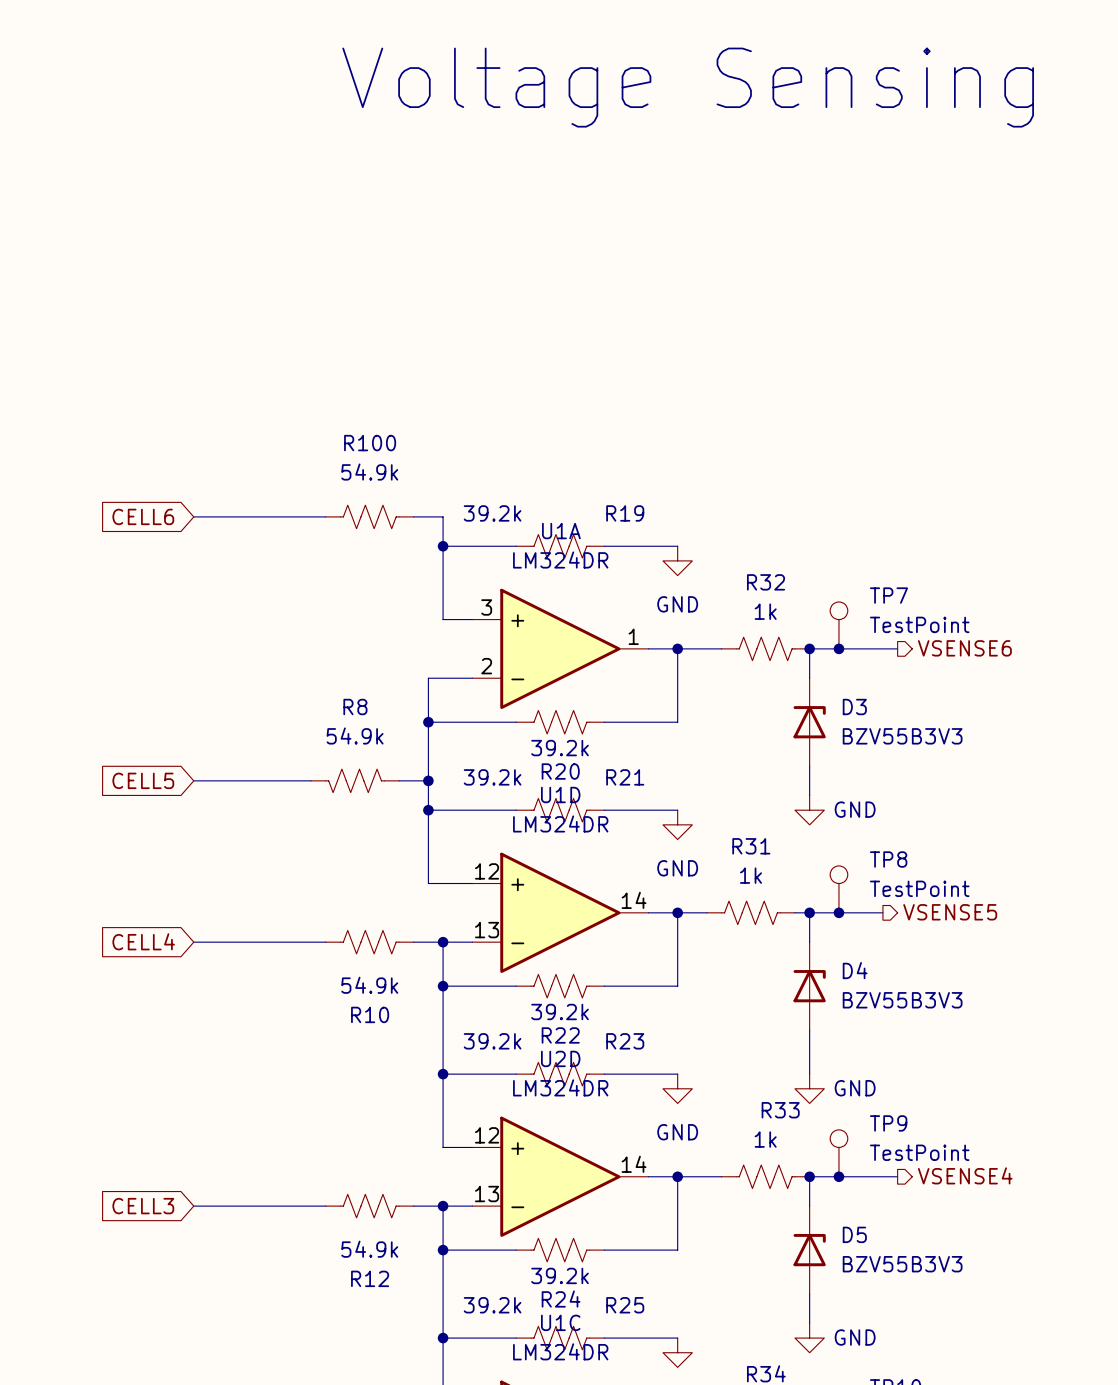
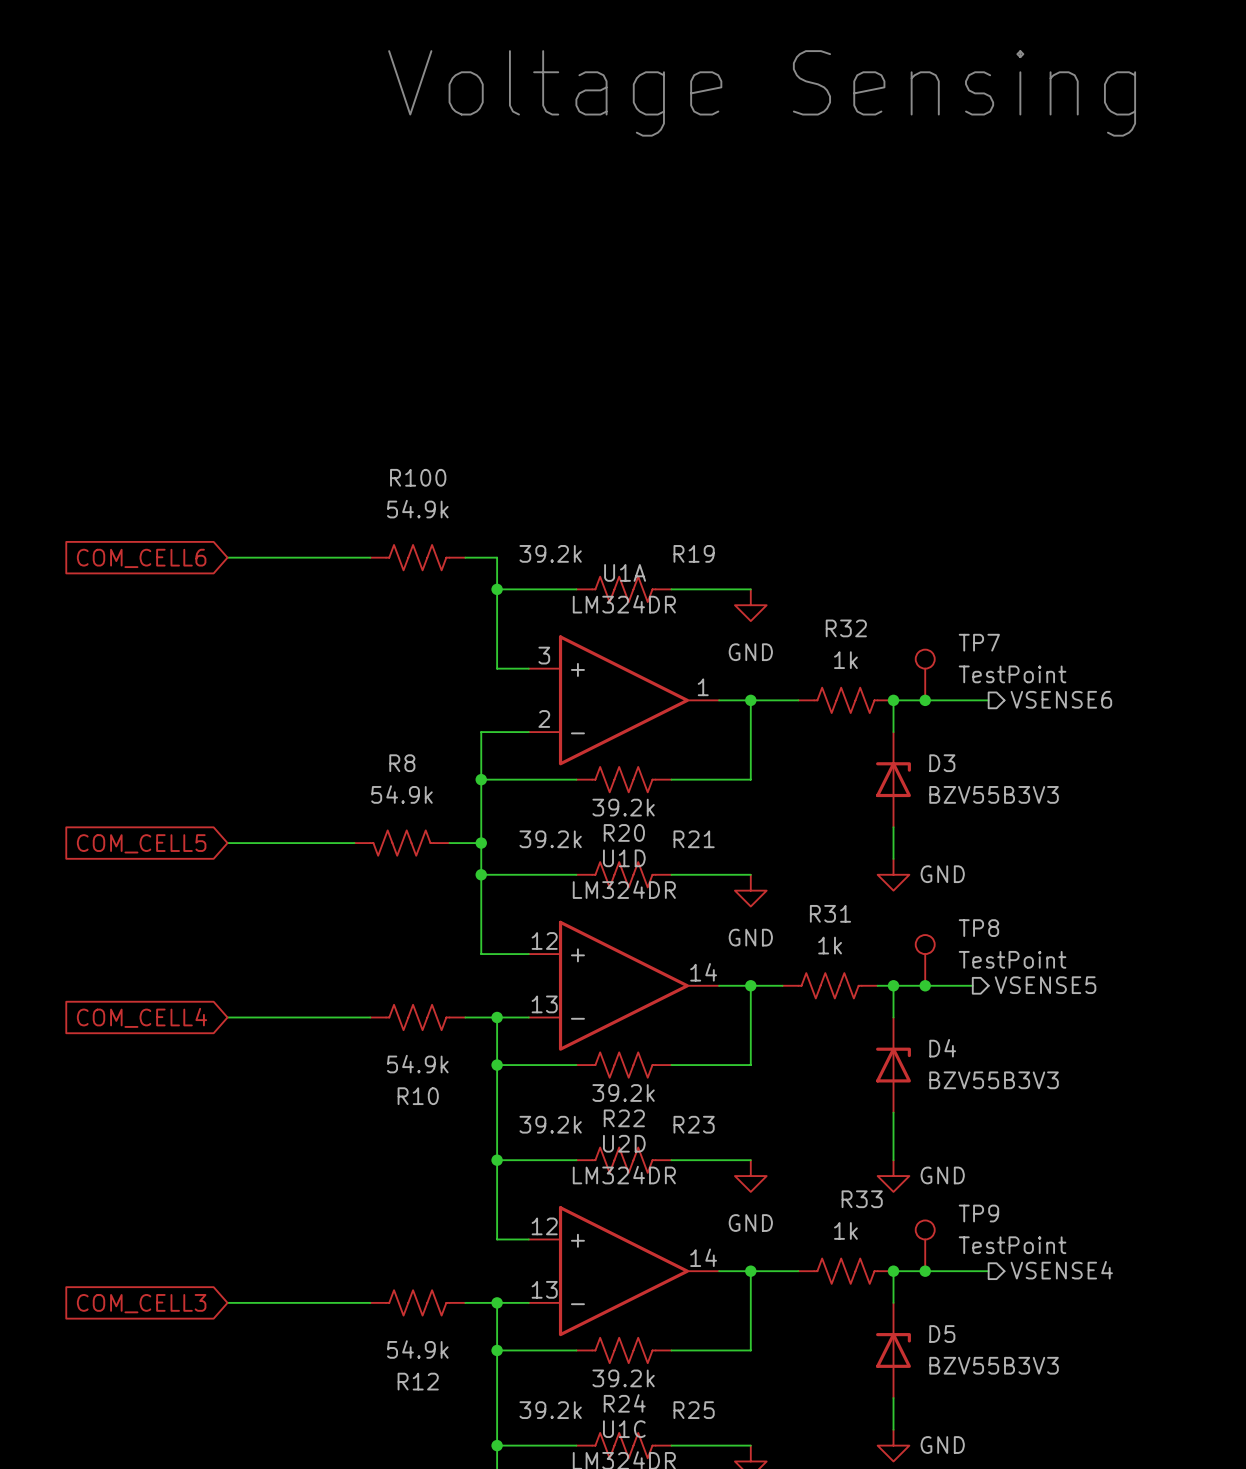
global label: CELL6 (143, 516) -> COM_CELL6 (141, 558)
global label: CELL5 (143, 780) -> COM_CELL5 (141, 843)
global label: CELL4 (143, 941) -> COM_CELL4 (142, 1017)
global label: CELL3 (143, 1206) -> COM_CELL3 (141, 1303)

